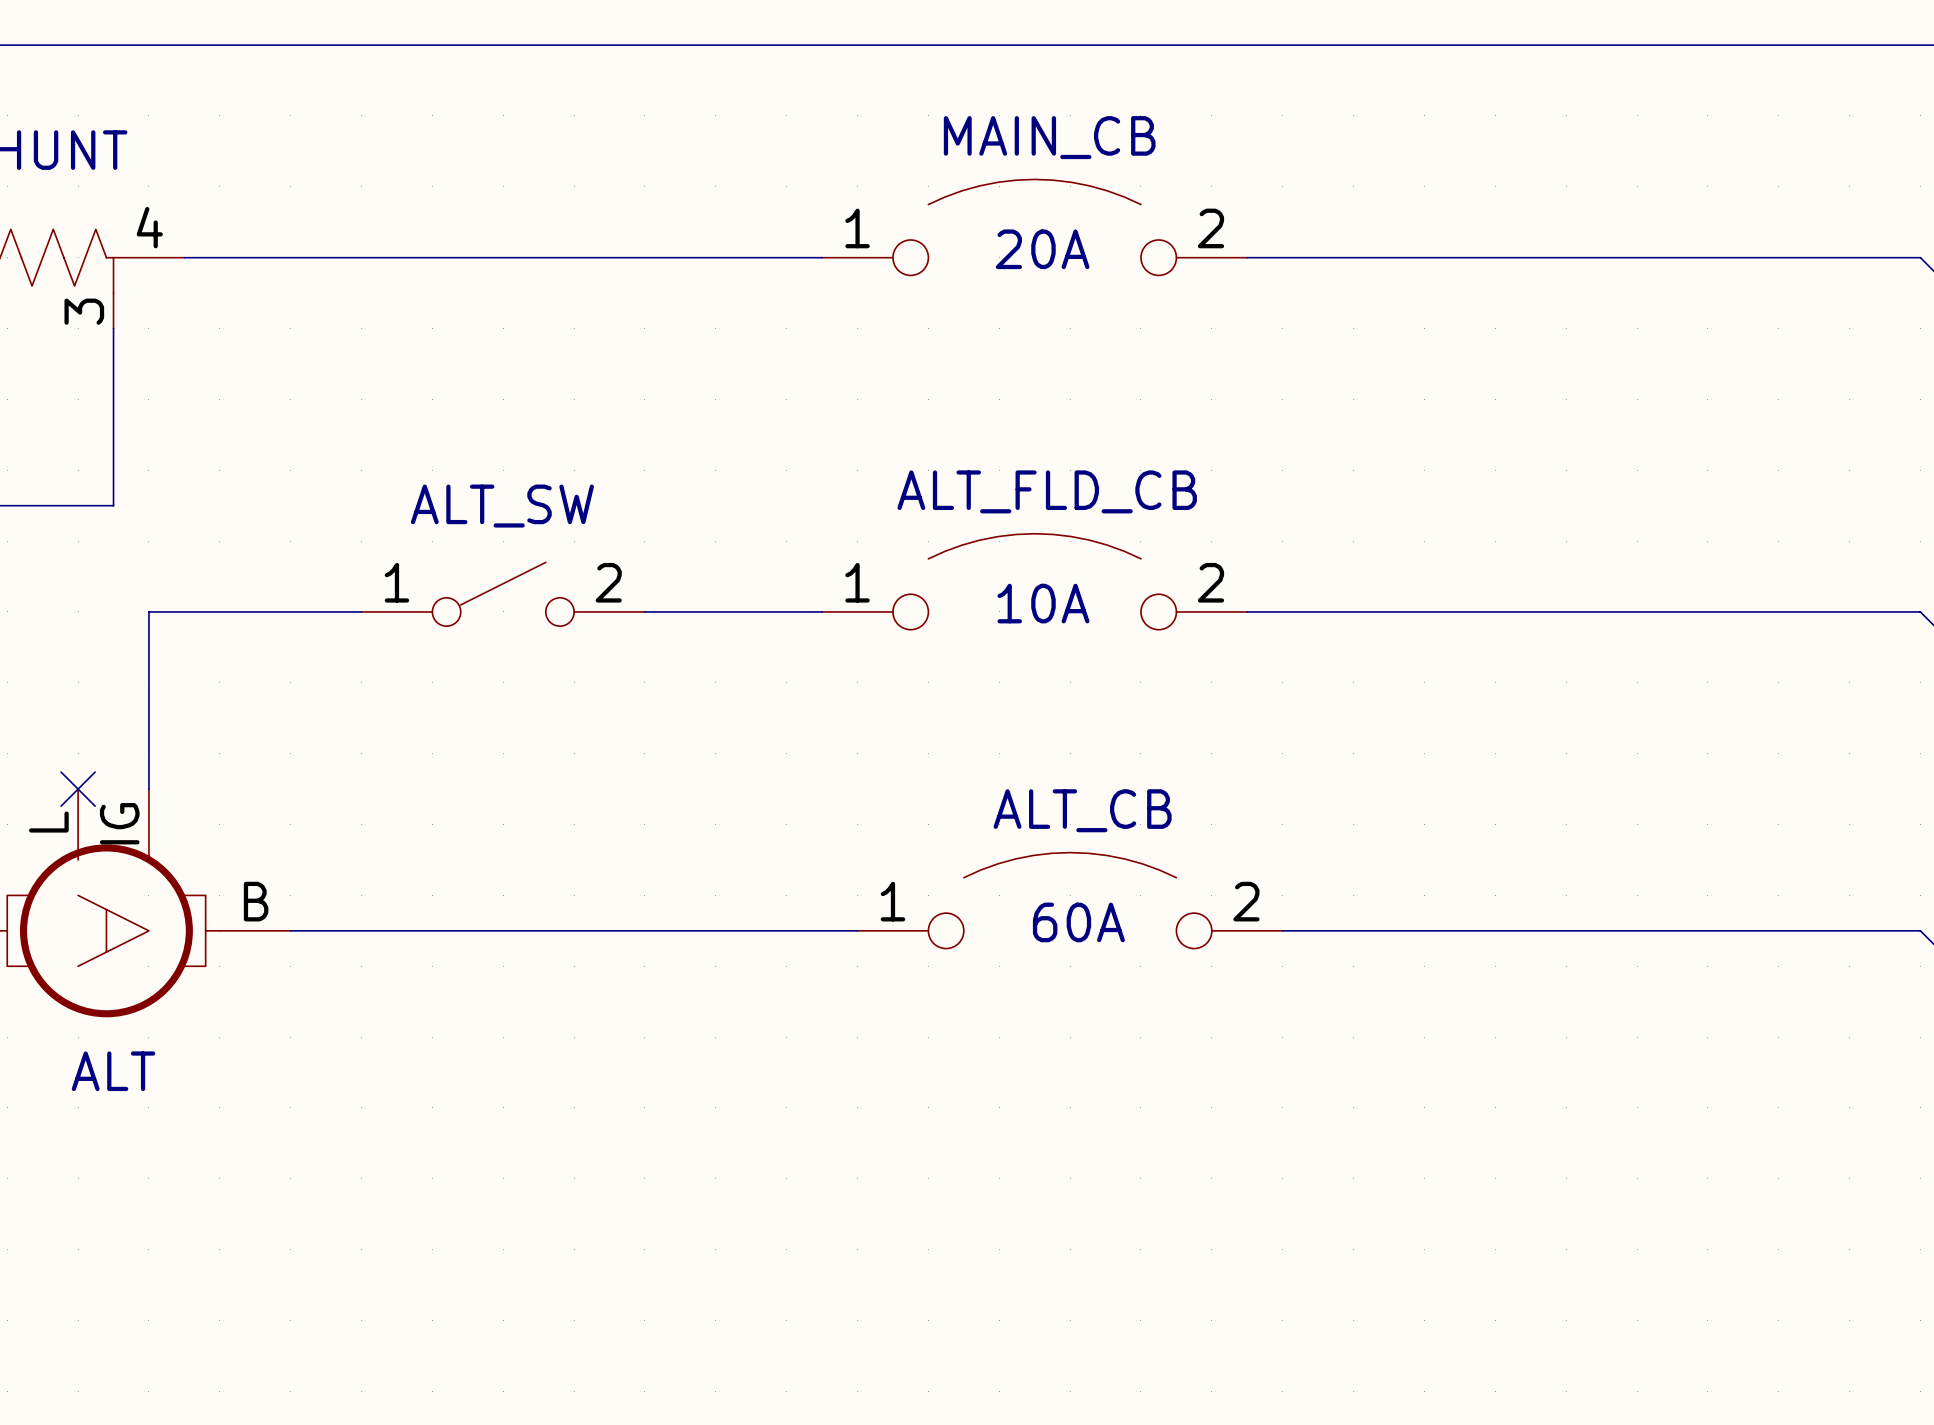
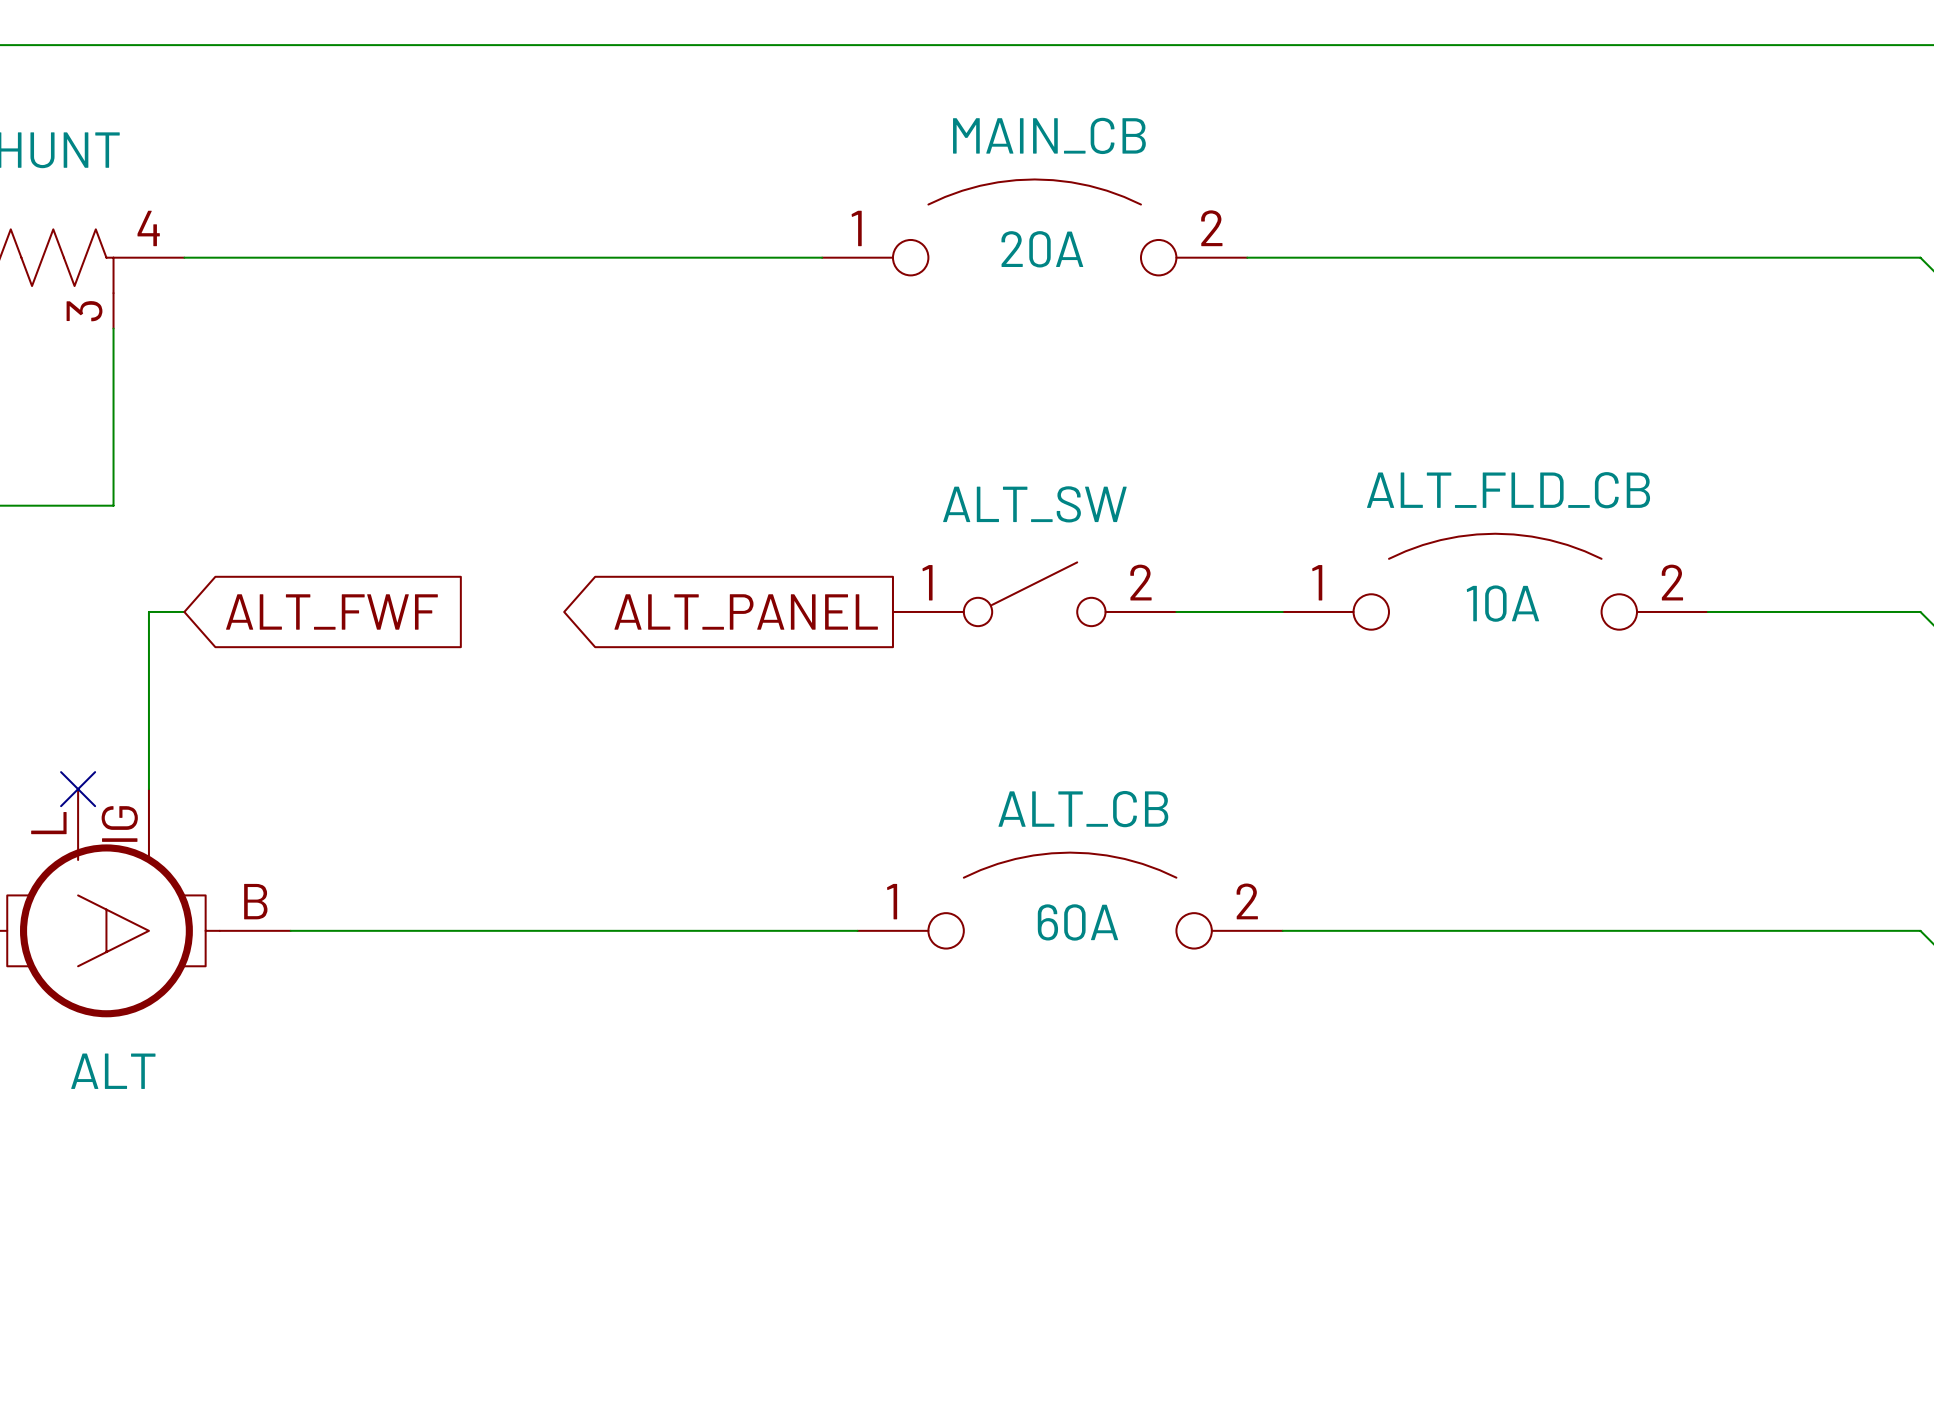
ALT_FLD_CB position: (1034, 581) -> (1495, 581)
ALT_SW position: (503, 594) -> (1034, 594)
wire: (184, 611) (361, 611) -> none
wire: (644, 611) (822, 611) -> none
wire: (1282, 611) (1707, 611) -> none
global label: none -> ALT_FWF (331, 611)
global label: none -> ALT_PANEL (746, 611)

